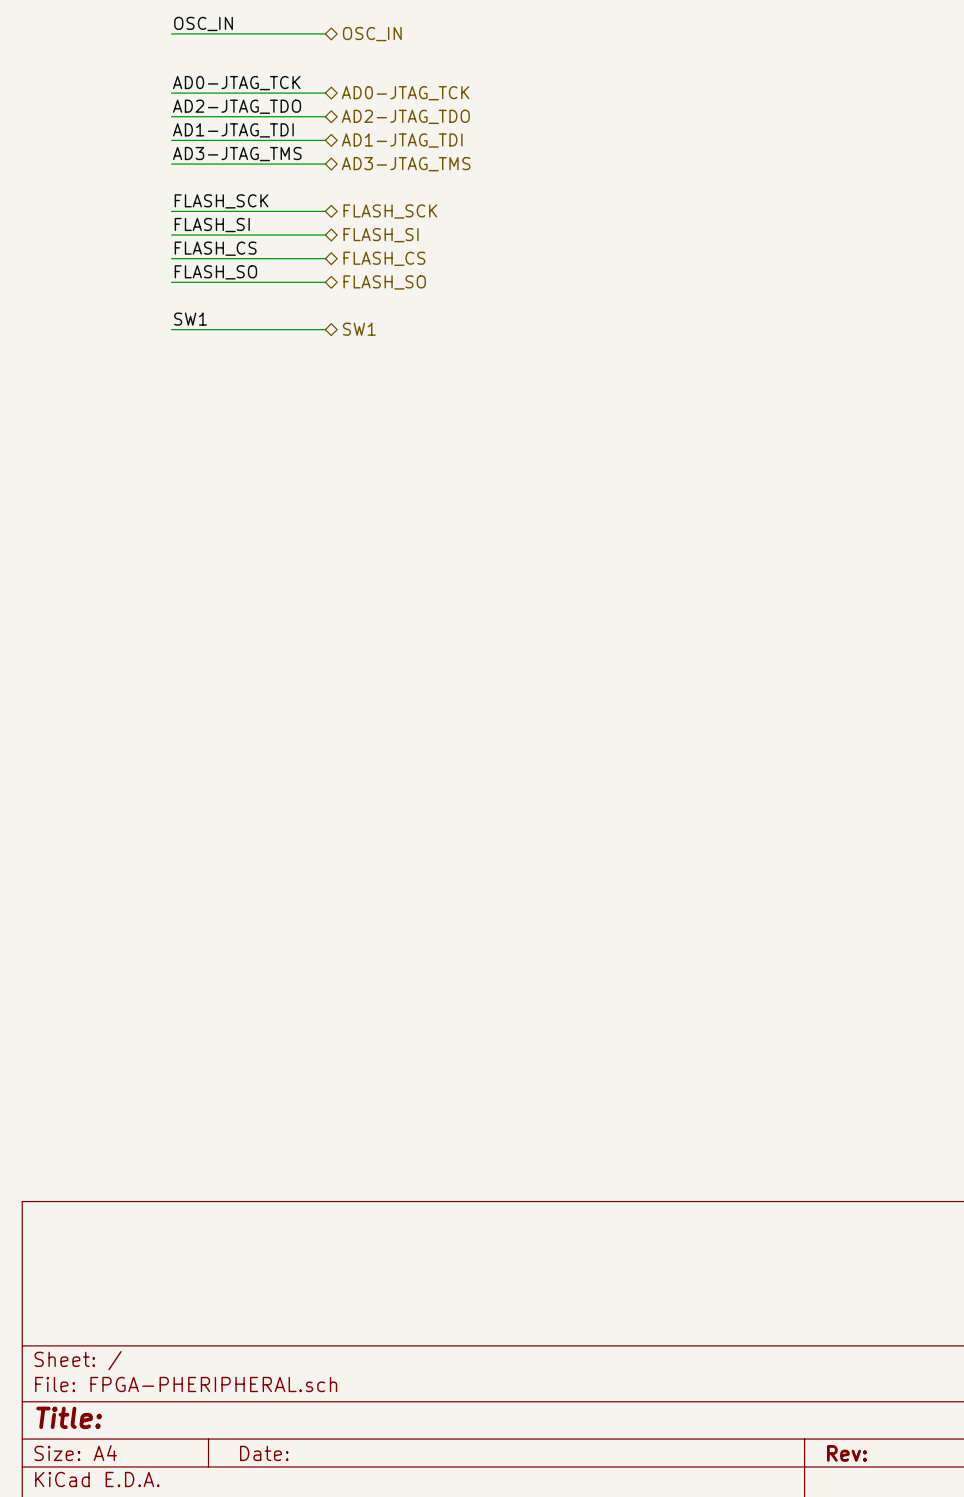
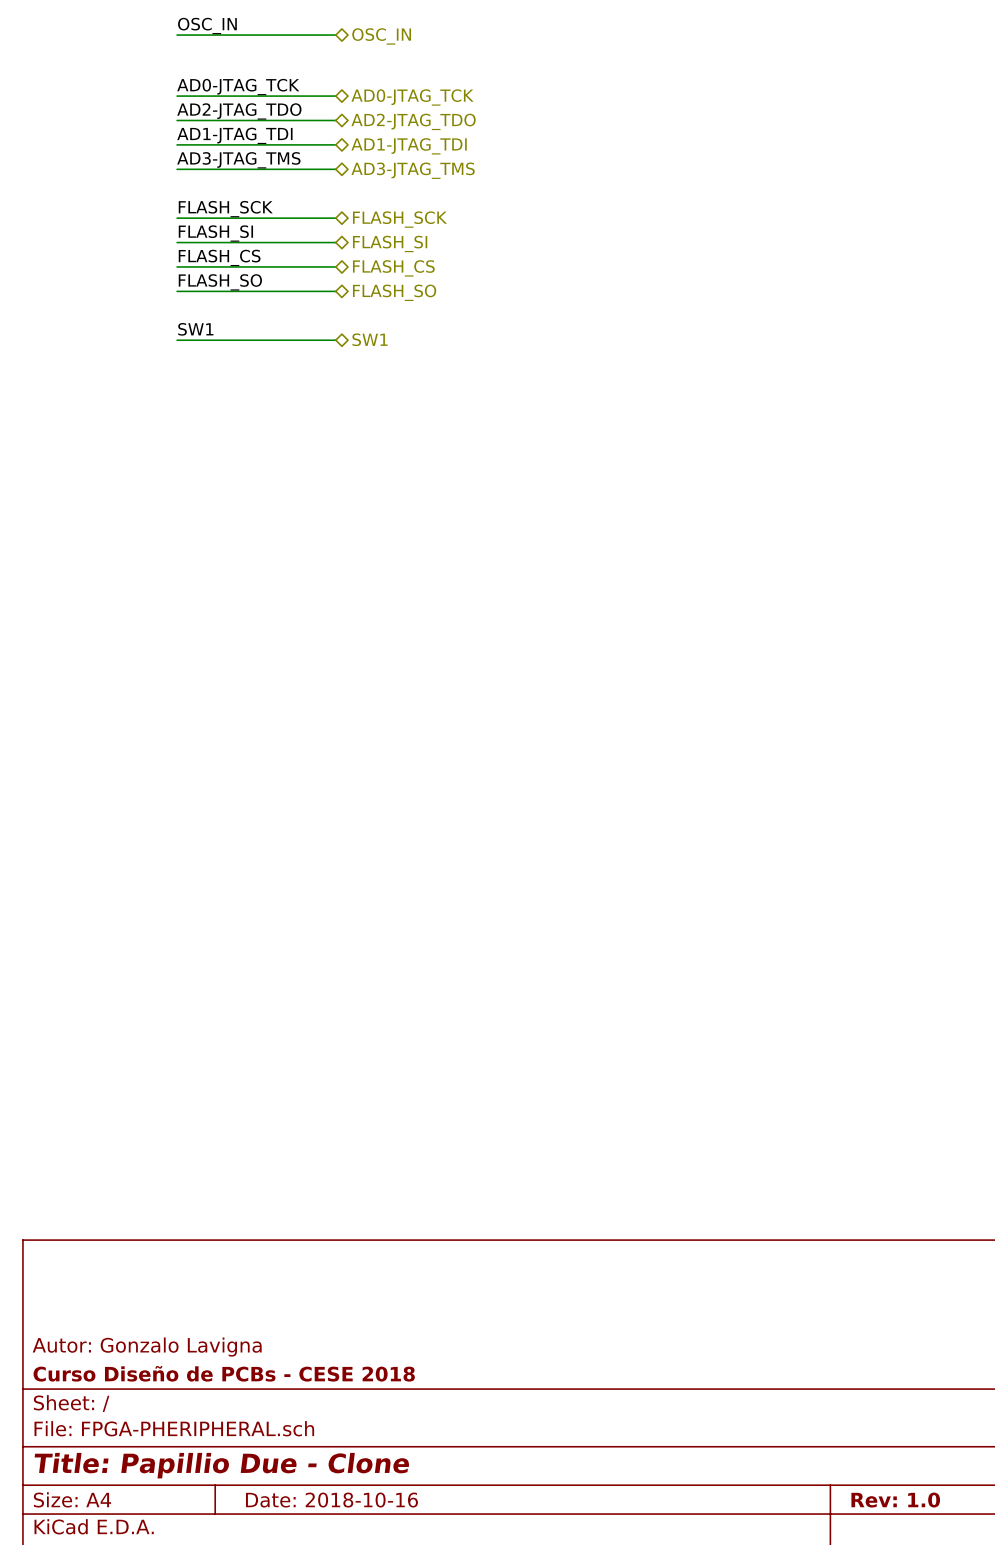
title block: none -> Autor: Gonzalo Lavigna (147, 1347)
title block: none -> Curso Diseño de PCBs - CESE 2018 (224, 1373)
title block: Title: (69, 1417) -> Title: Papillio Due - Clone (222, 1465)
title block: Date: (264, 1453) -> Date: 2018-10-16 (331, 1500)
title block: Rev: (846, 1453) -> Rev: 1.0 (895, 1500)

